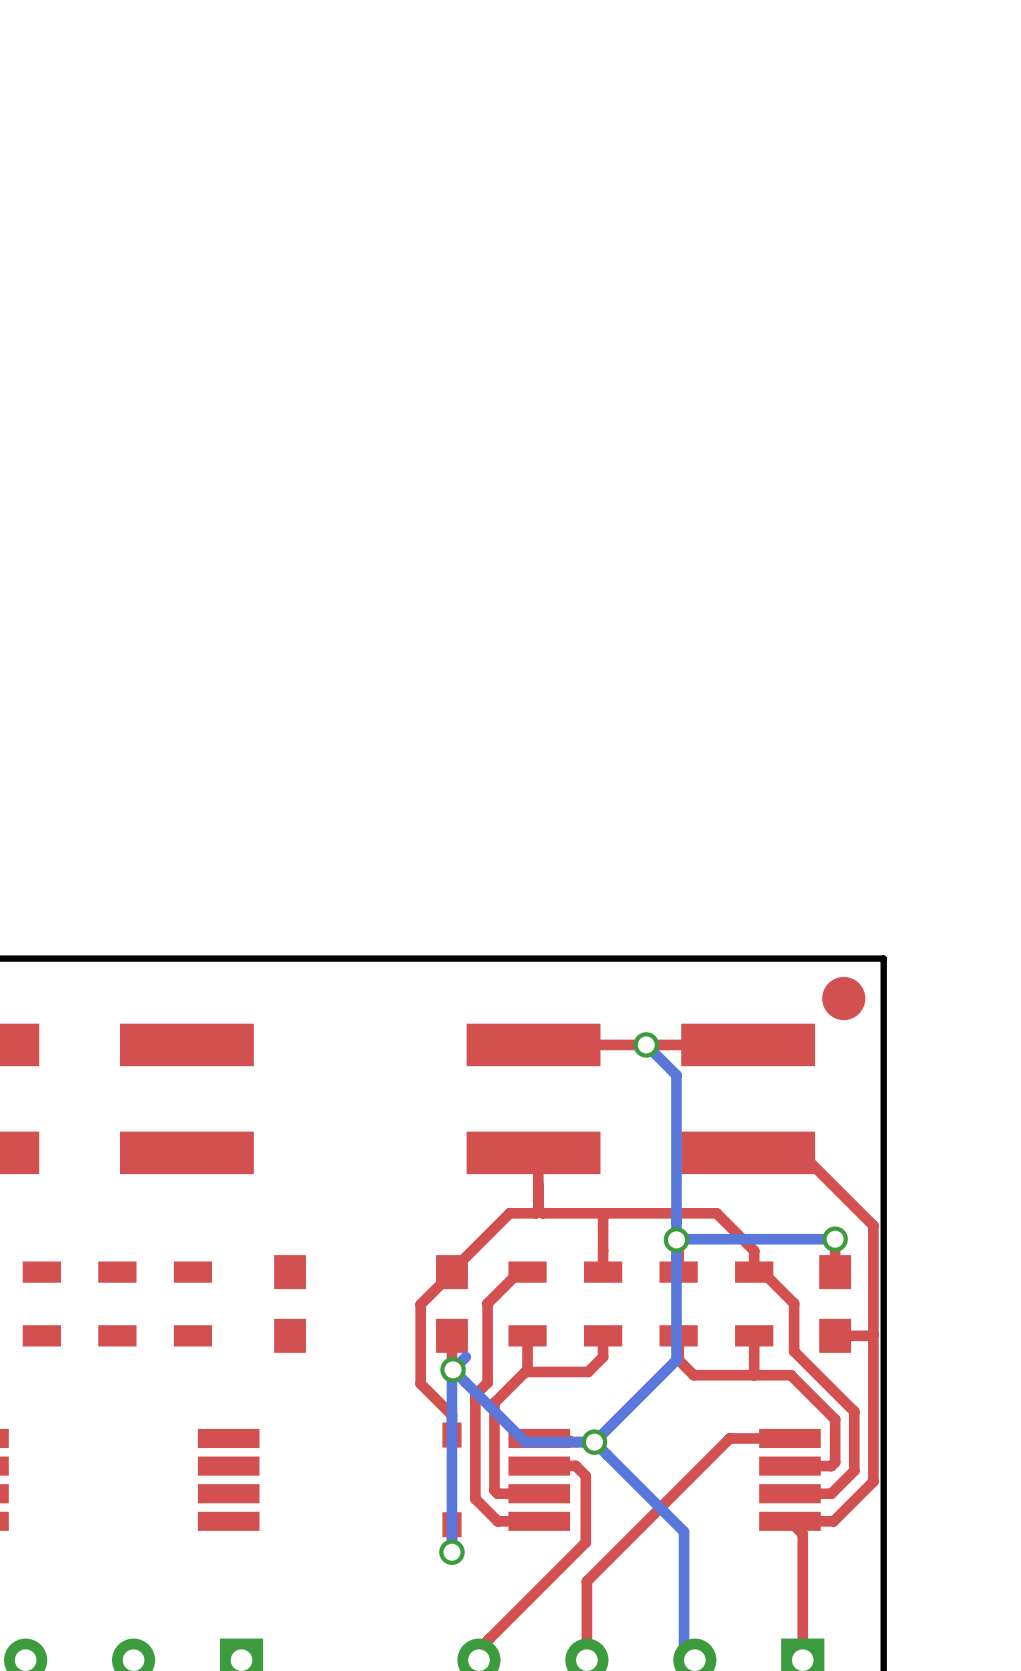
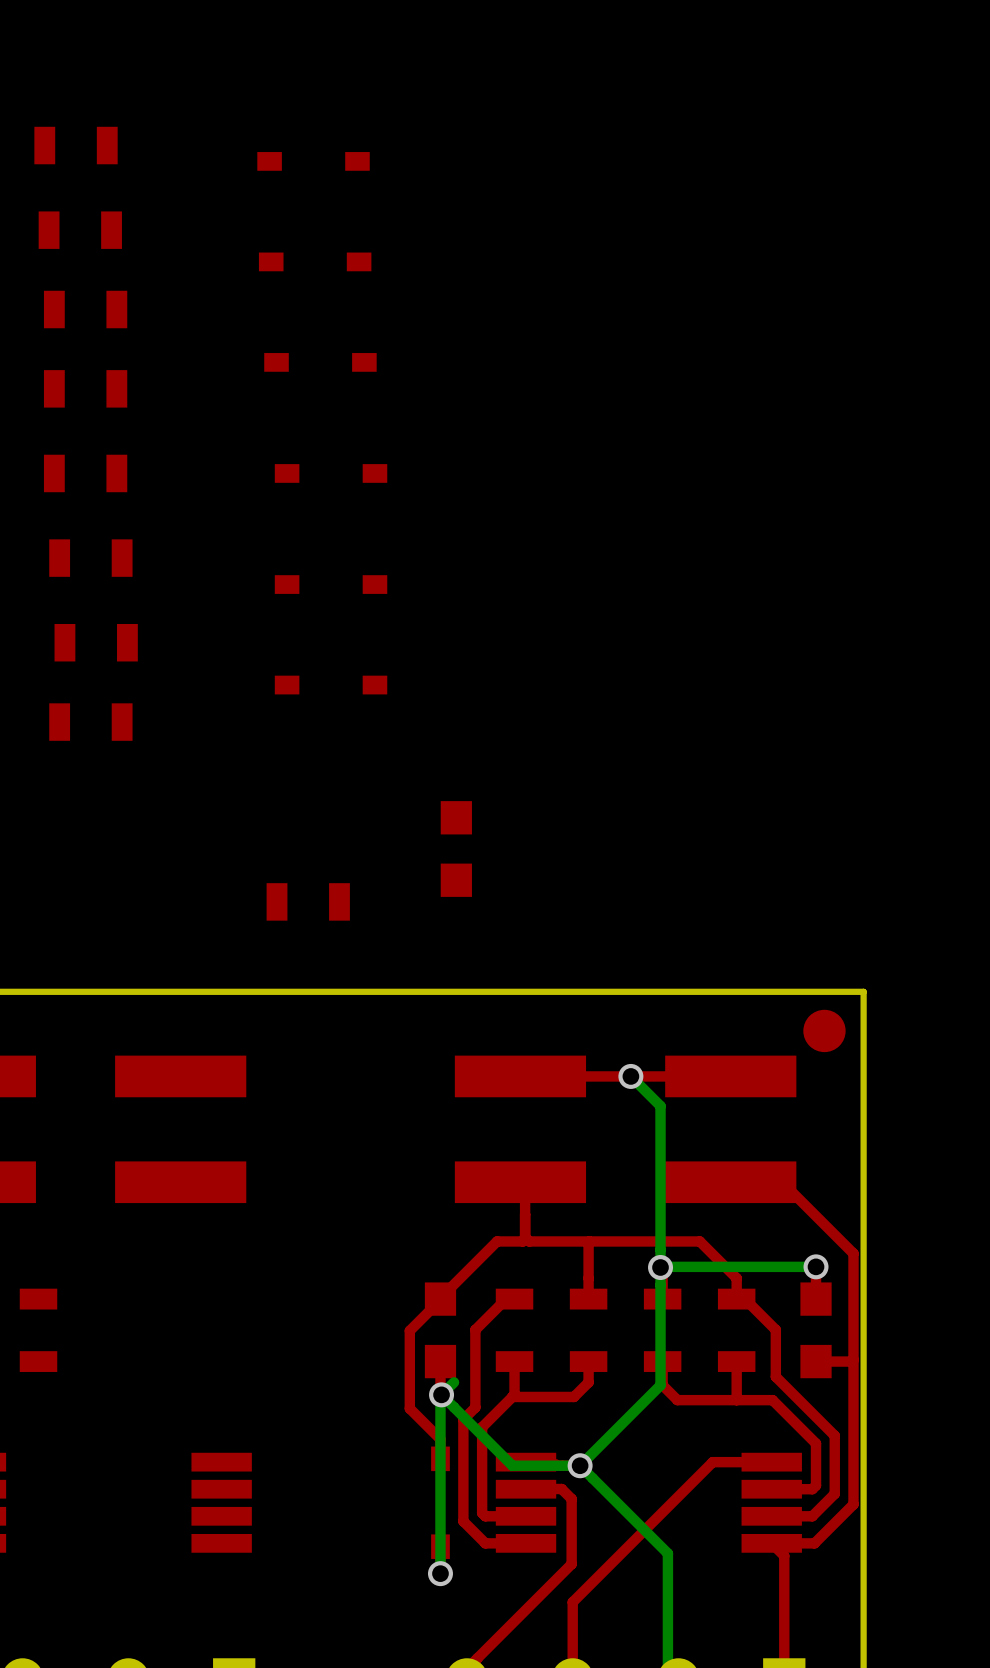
part: none -> (76, 145)
part: none -> (313, 161)
part: none -> (80, 230)
part: none -> (315, 261)
part: none -> (85, 309)
part: none -> (320, 362)
part: none -> (85, 388)
part: none -> (85, 473)
part: none -> (331, 473)
part: none -> (90, 558)
part: none -> (331, 584)
part: none -> (96, 642)
part: none -> (331, 685)
part: none -> (90, 722)
part: none -> (456, 849)
part: none -> (308, 901)
part: (117, 1303) -> none
part: (192, 1303) -> none
part: (290, 1303) -> none

